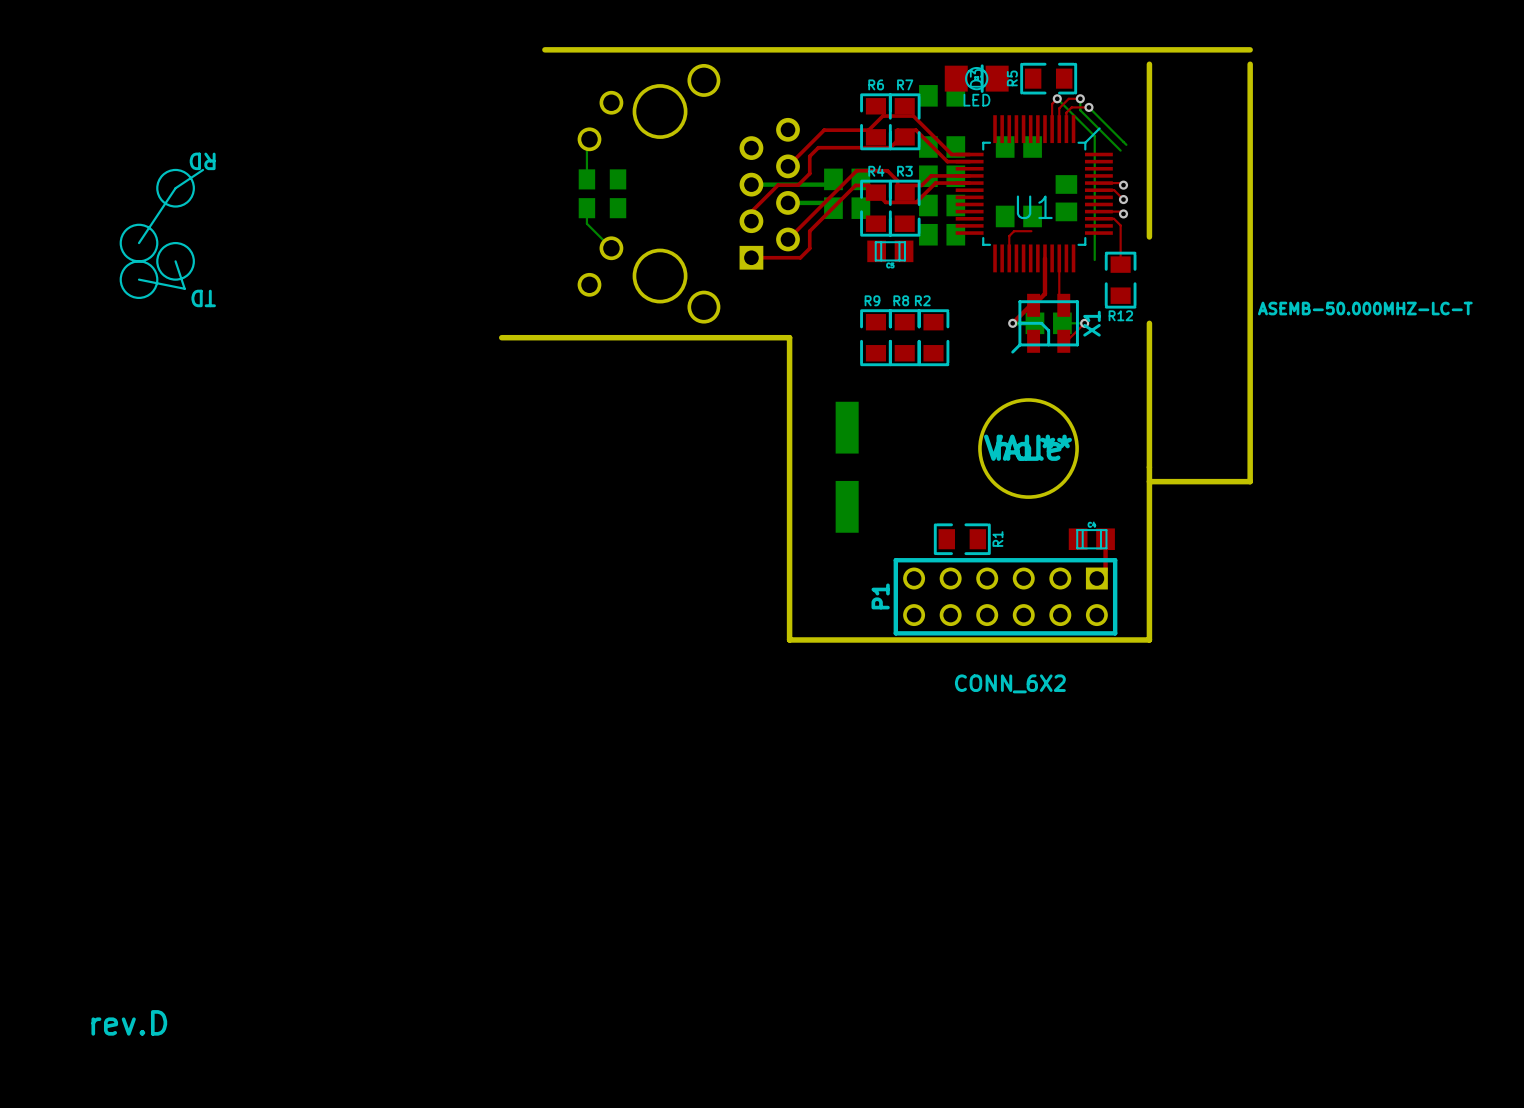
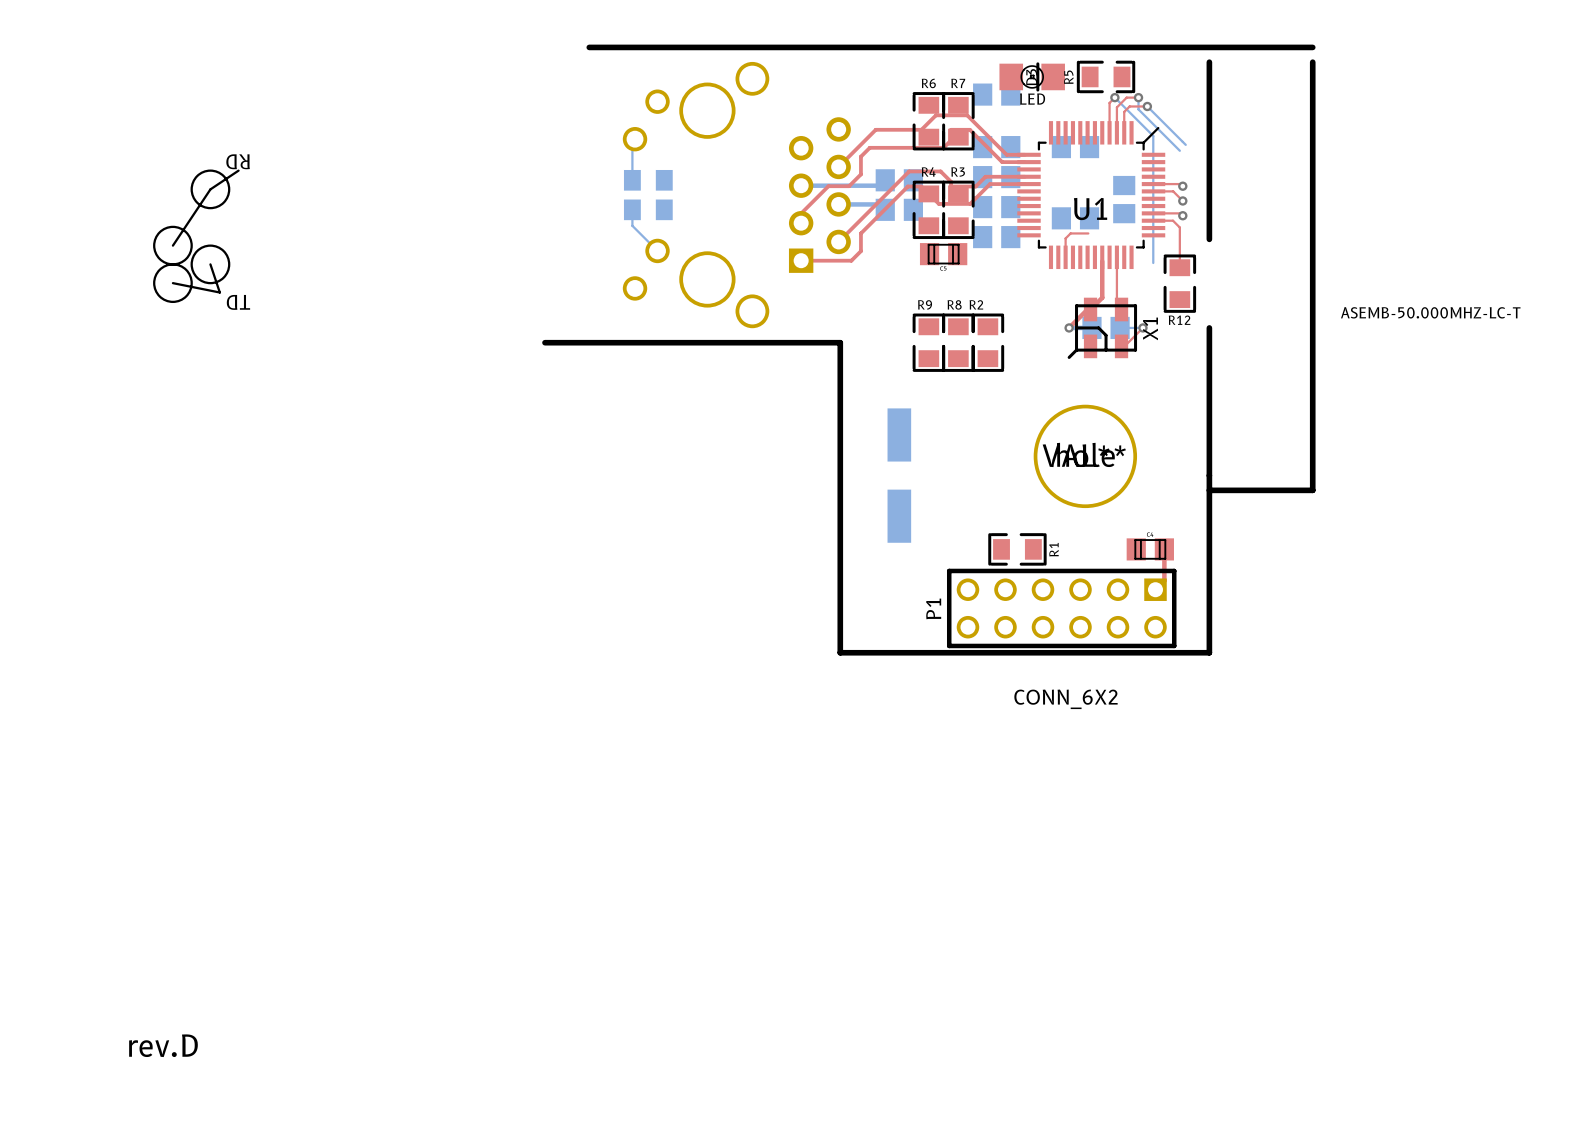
U1 footprint: [955, 115, 1113, 273] -> [1017, 121, 1166, 270]

